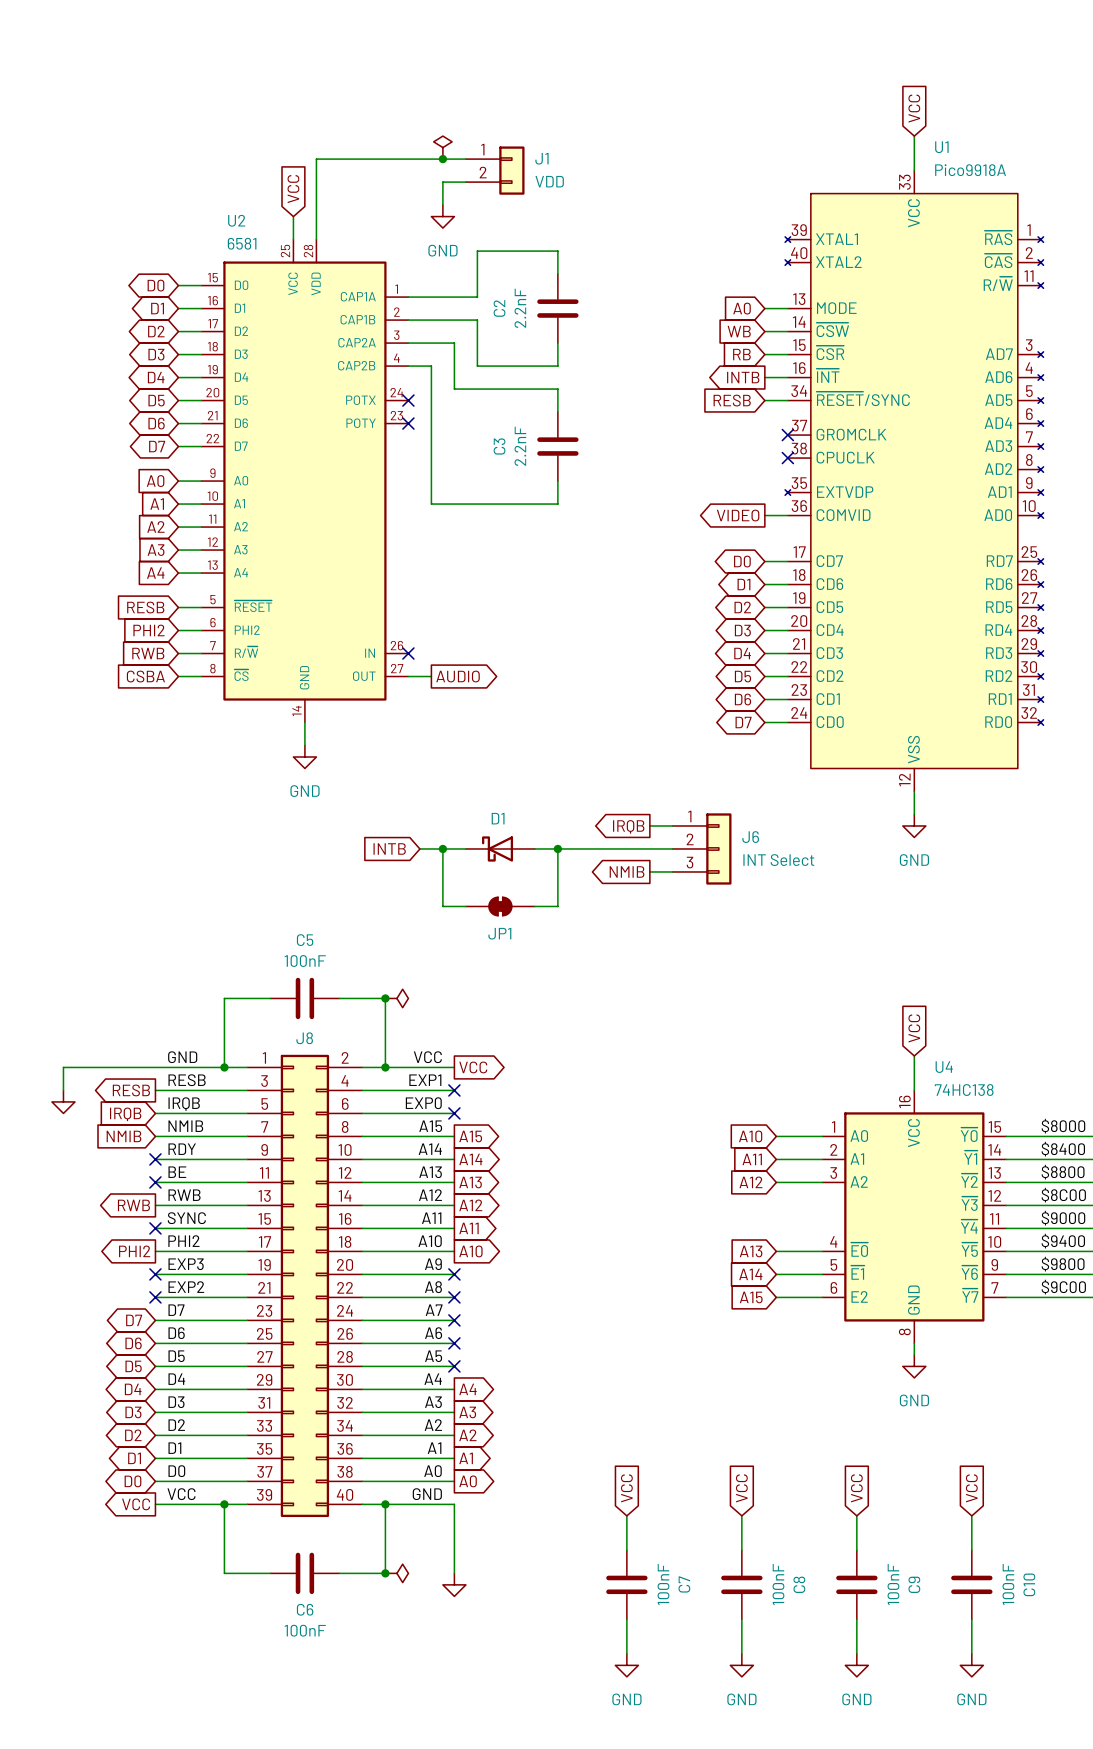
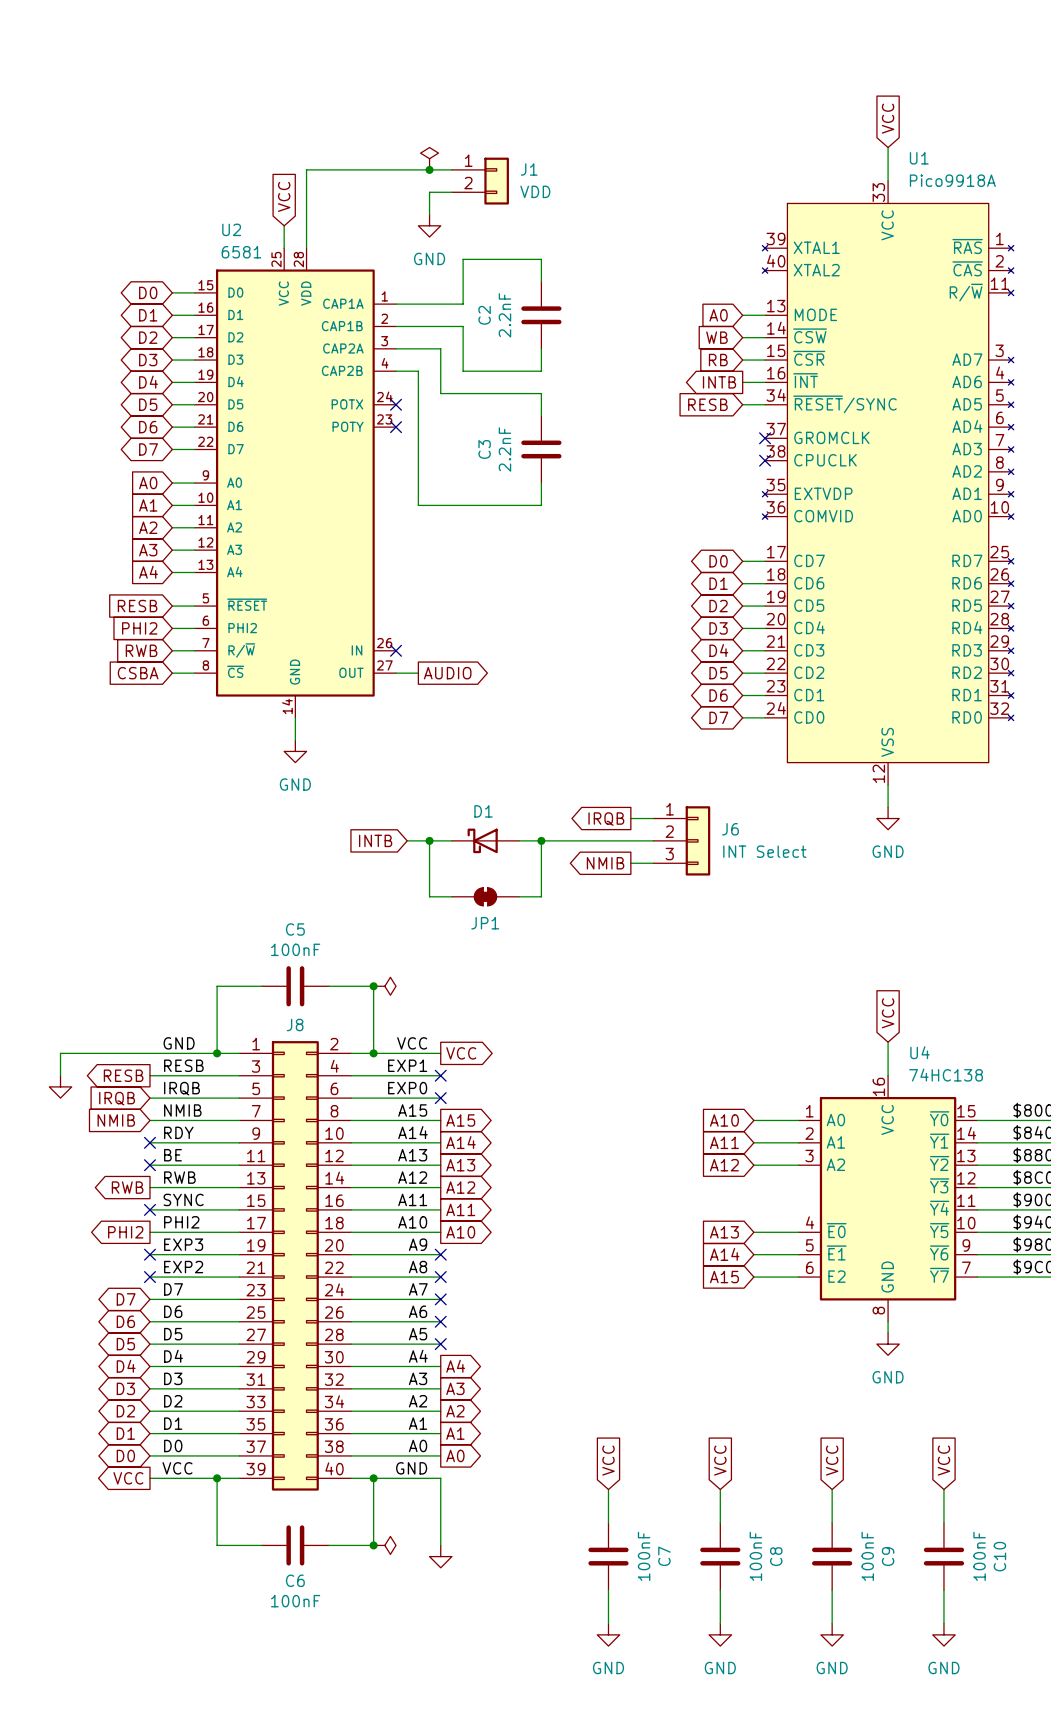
U1 symbol: [785, 170, 1044, 792] -> [762, 181, 1014, 785]
global label: VIDEO (738, 515) -> none
wire: (764, 515) (787, 515) -> none

